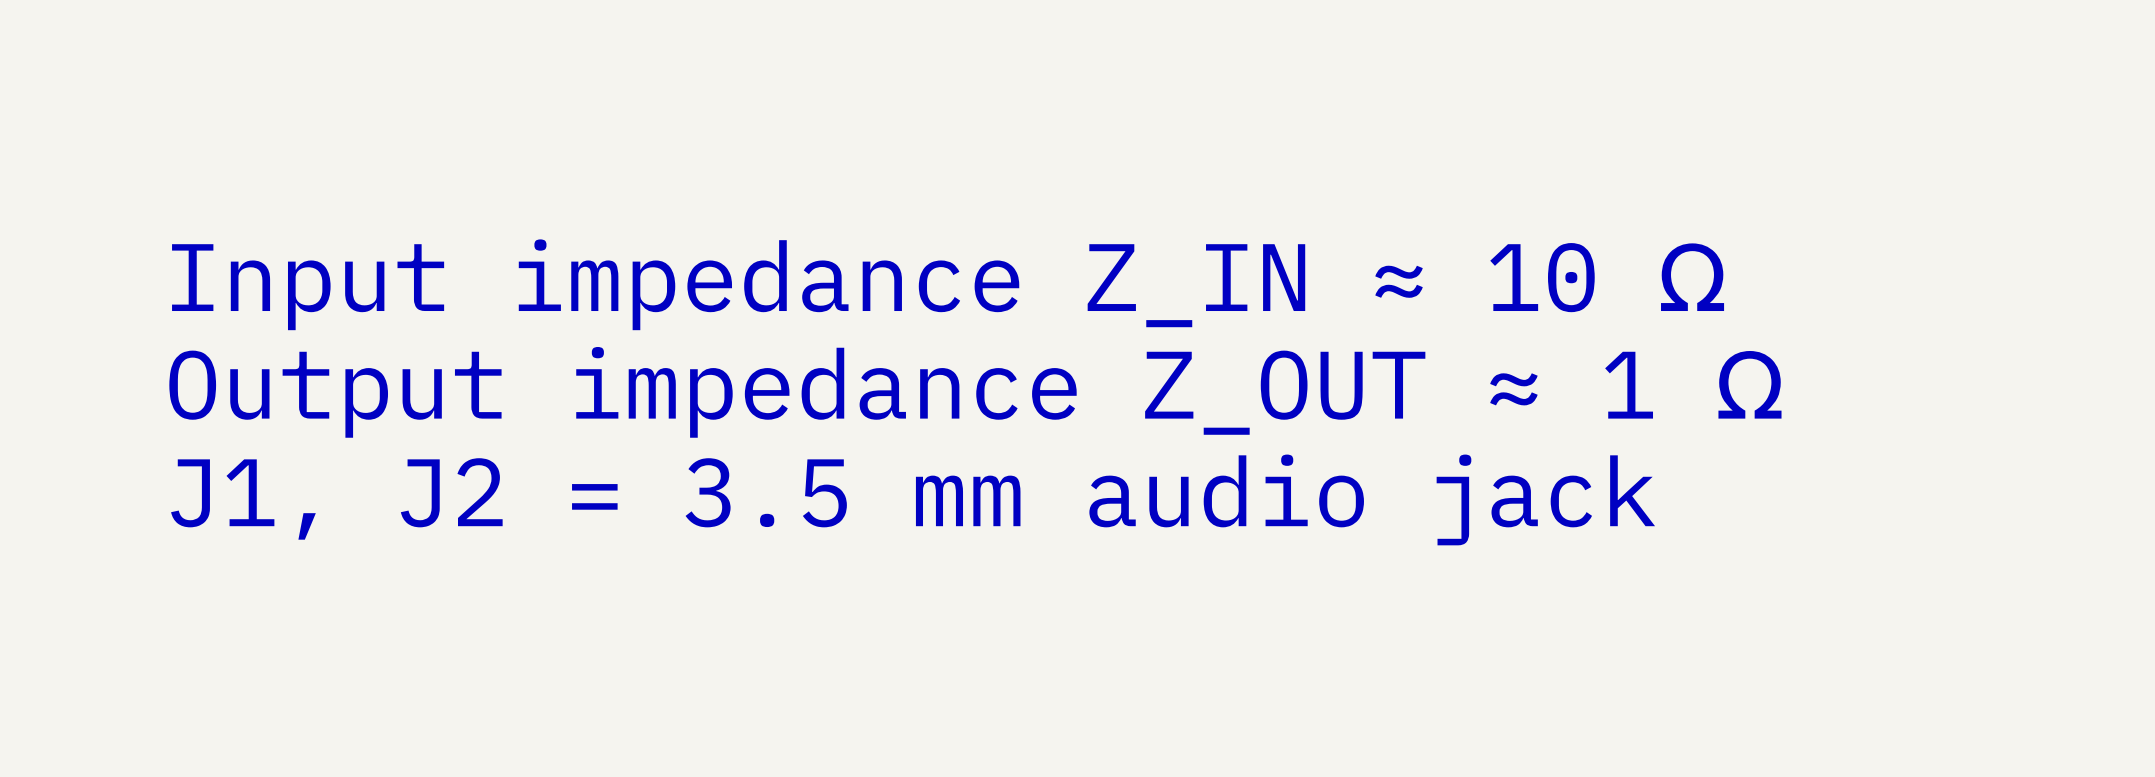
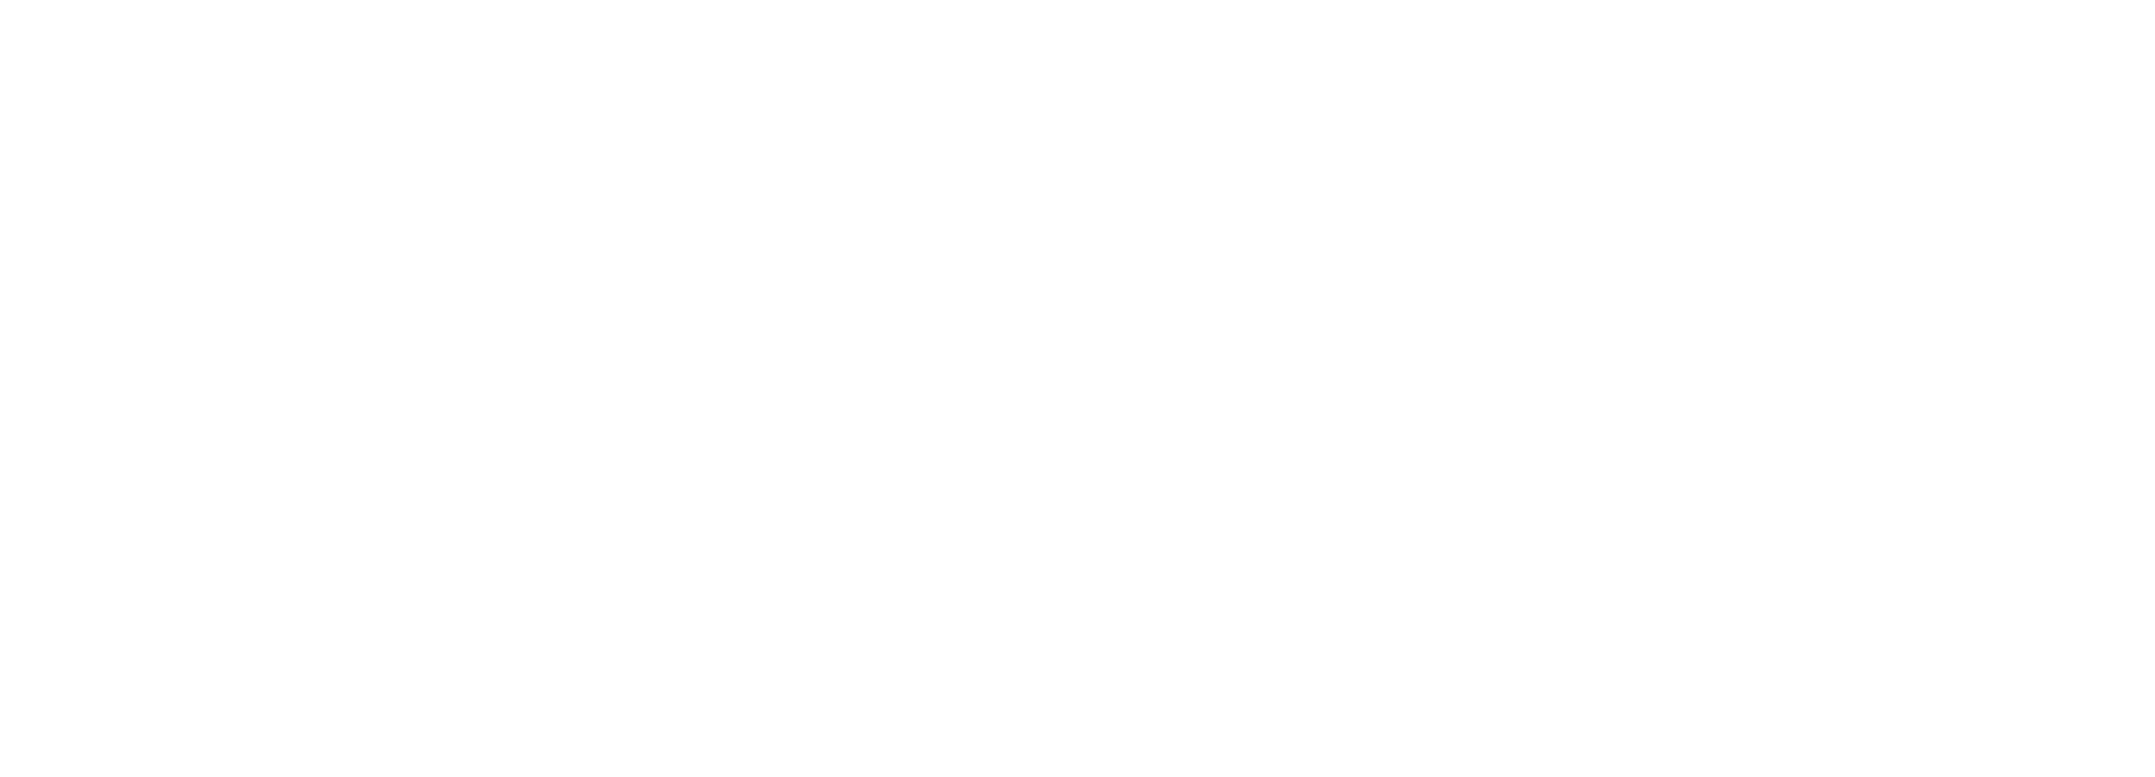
text: Input impedance Z_IN ≈ 10 Ω (948, 284) -> none
text: Output impedance Z_OUT ≈ 1 Ω (975, 392) -> none
text: J1, J2 = 3.5 mm audio jack (913, 499) -> none

